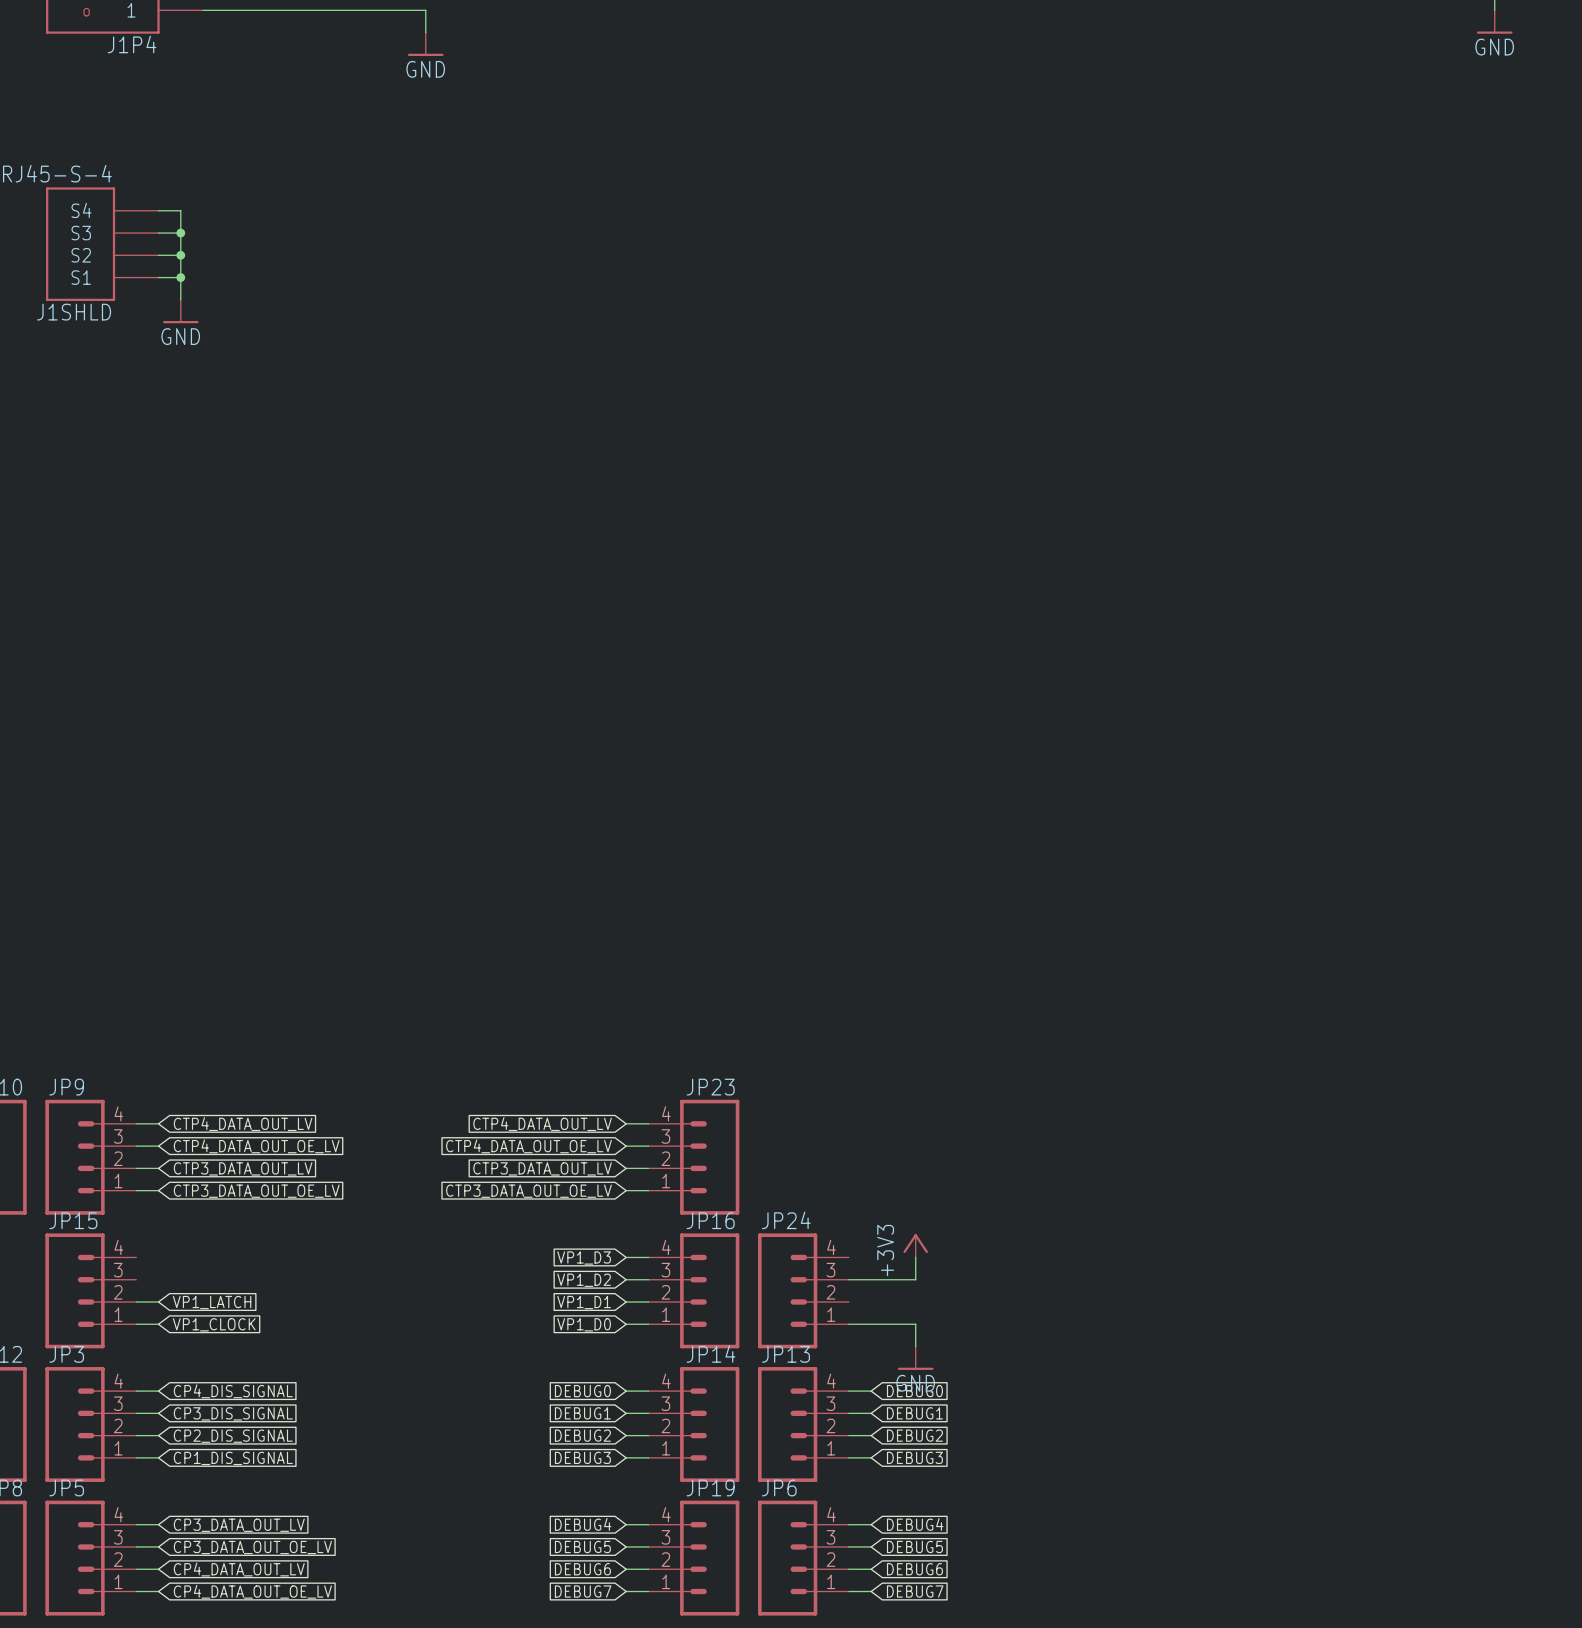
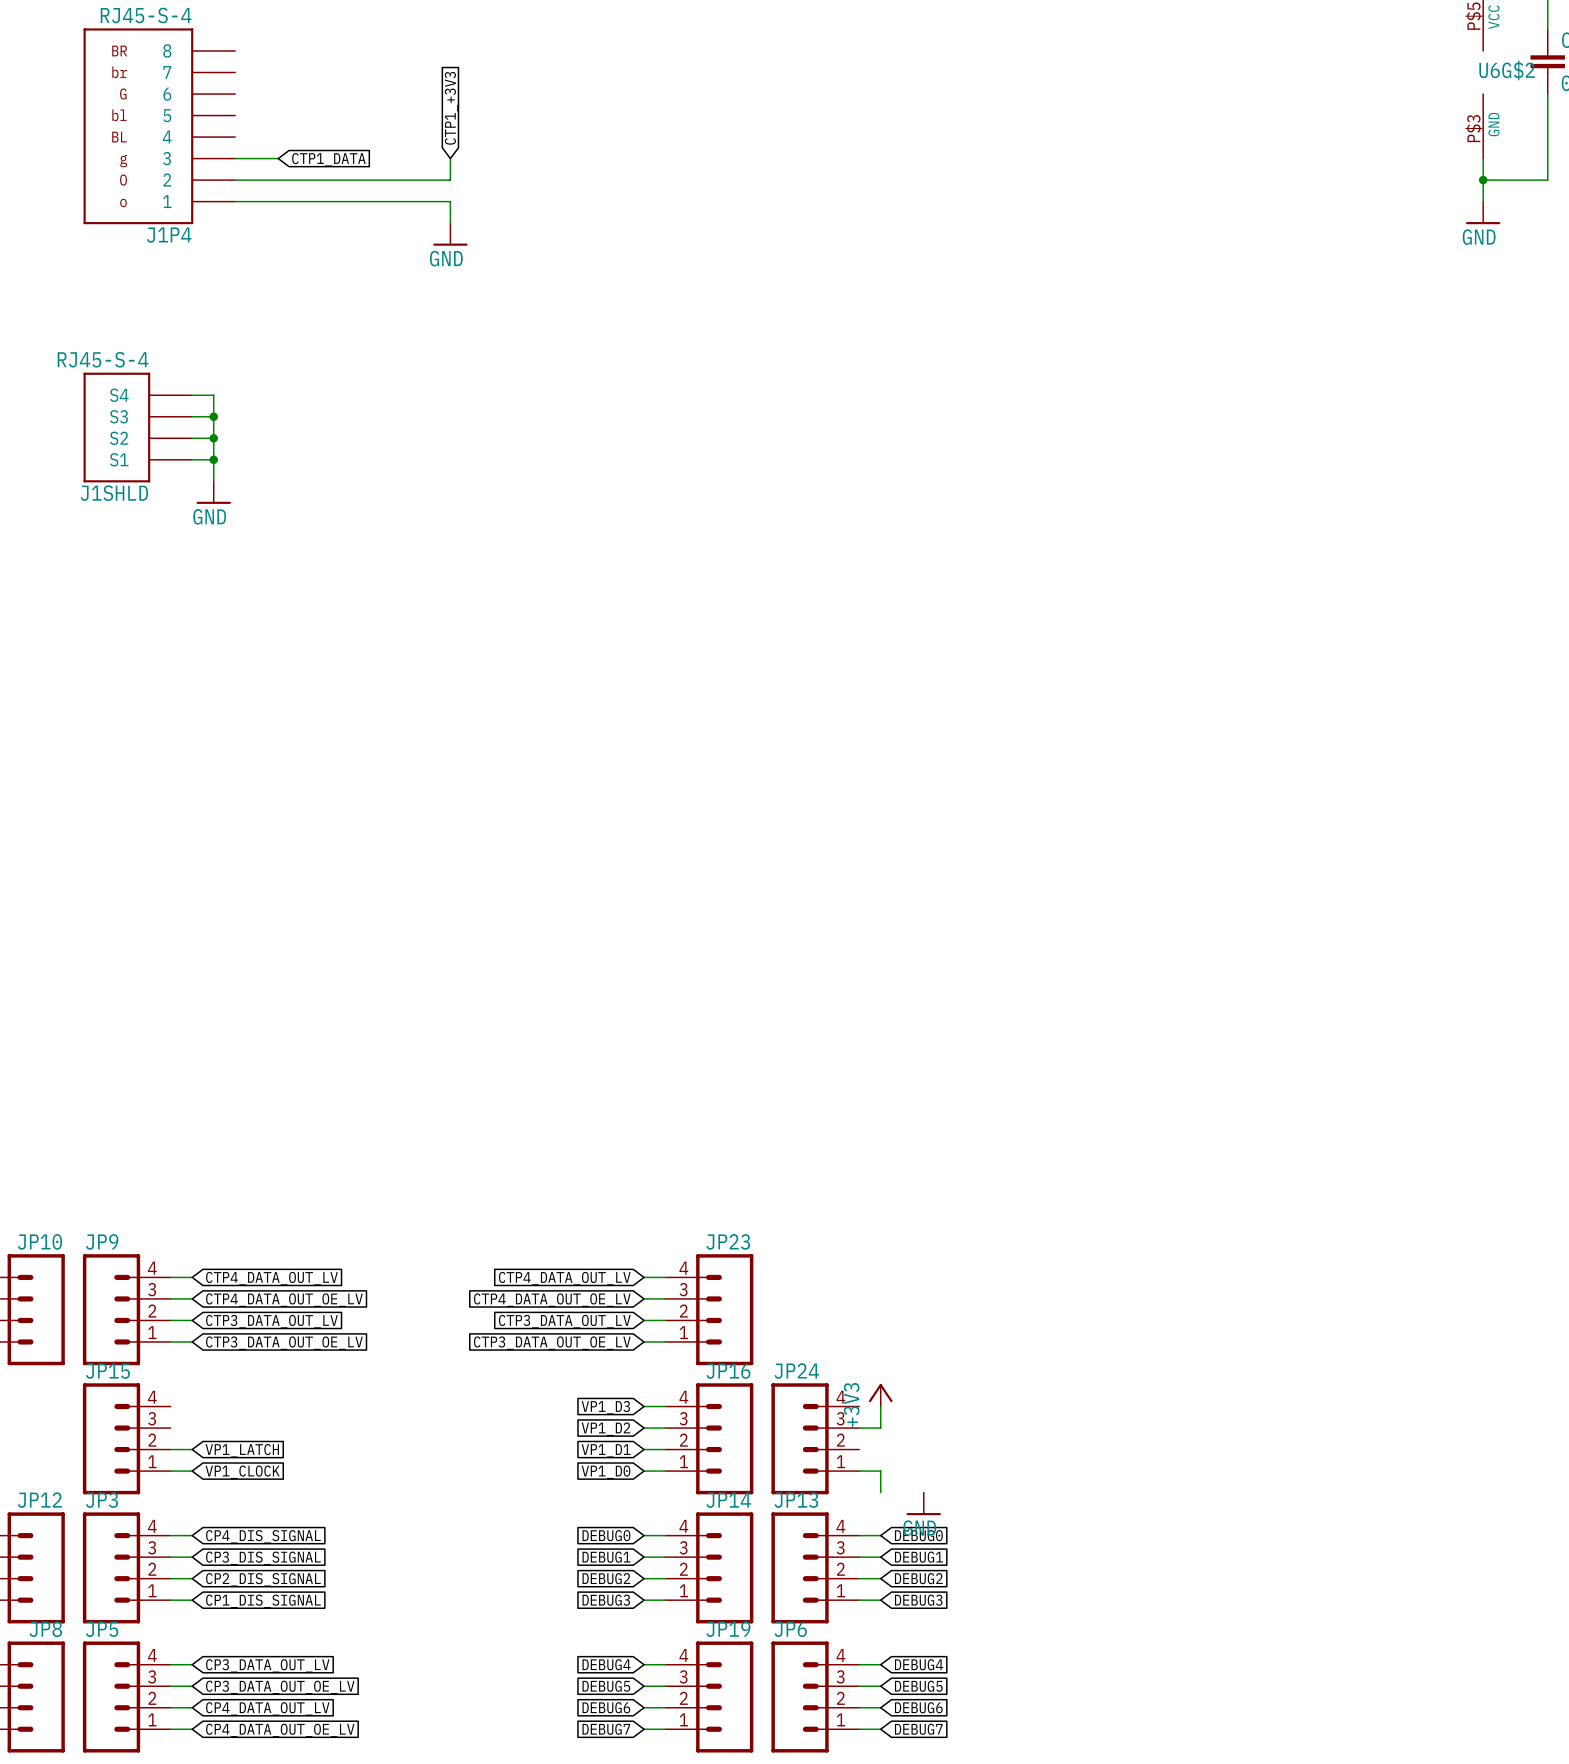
power symbol position: +3V3 (915, 1245) -> +3V3 (880, 1395)
wire: (915, 1257) (915, 1279) (871, 1279) -> (880, 1406) (880, 1428)
wire: (871, 1324) (915, 1324) (915, 1346) -> (880, 1471) (880, 1492)

